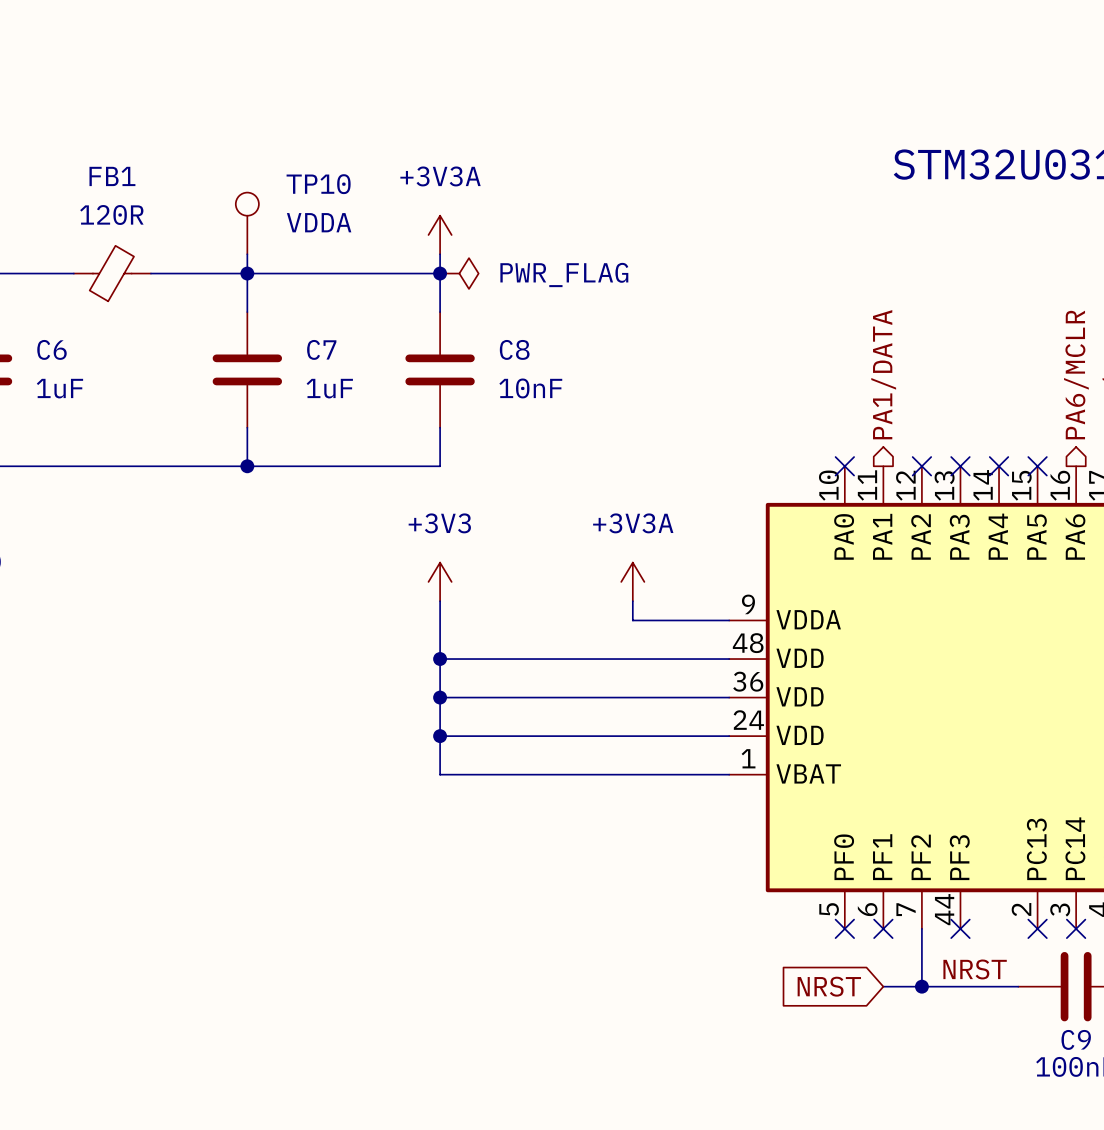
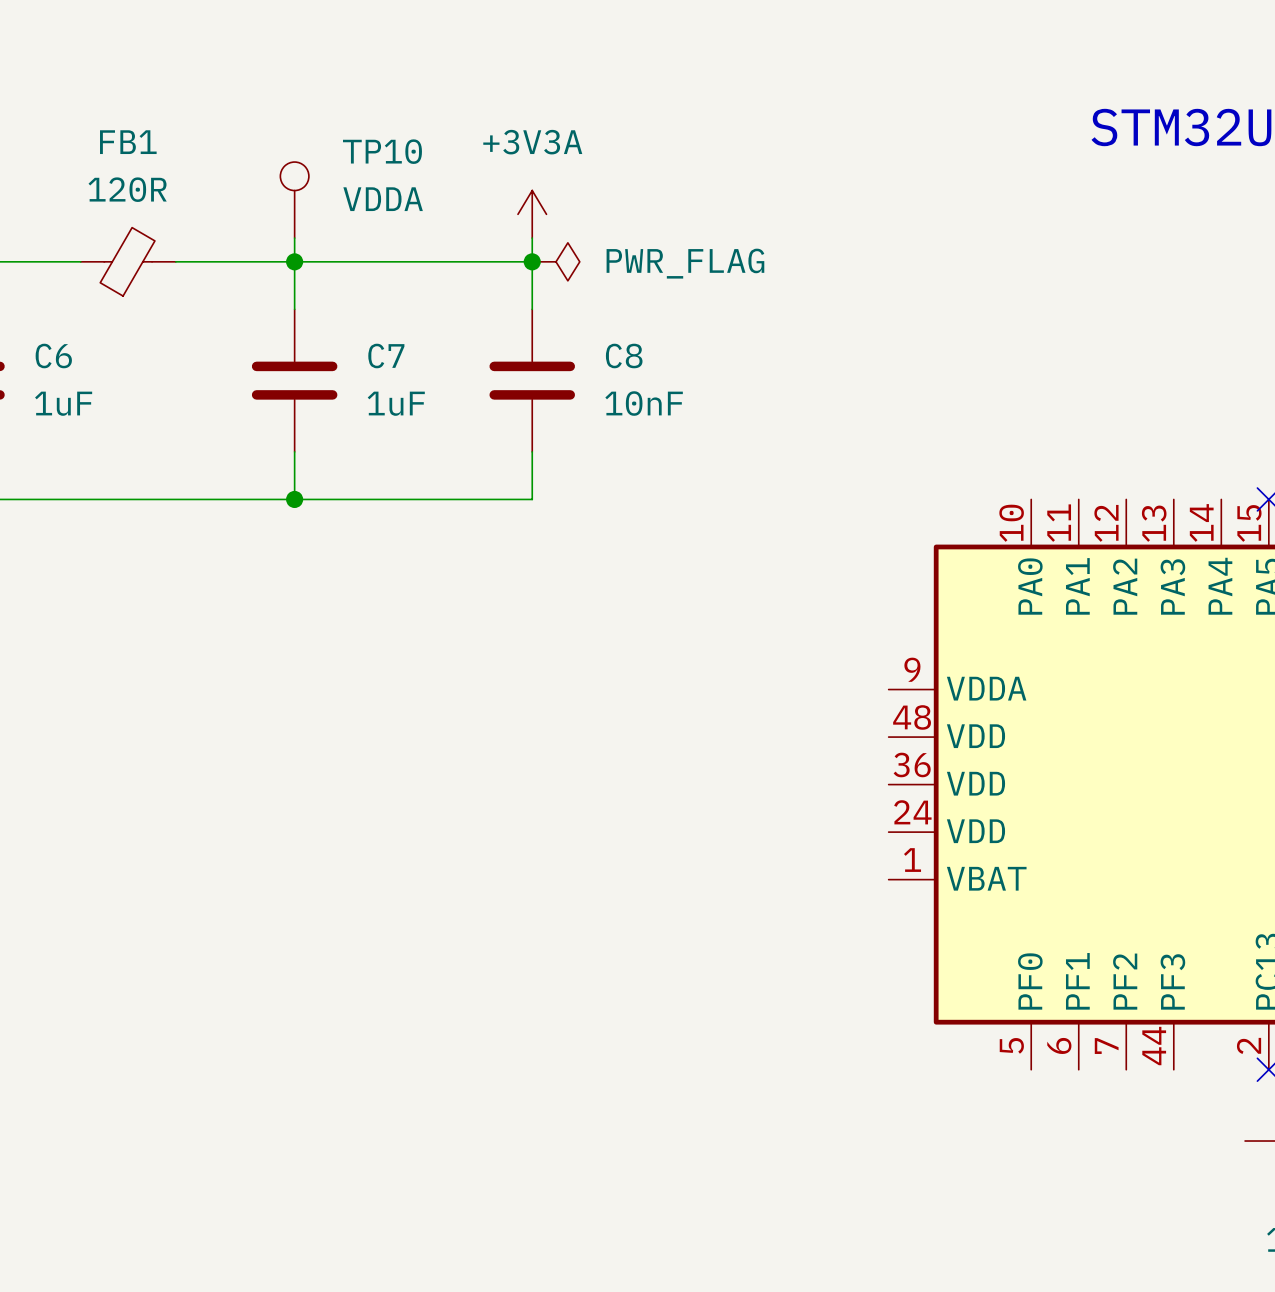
hierarchical label: PA1/DATA (883, 374) -> none
no-connect mark: (844, 466) -> none
no-connect mark: (921, 466) -> none
no-connect mark: (960, 466) -> none
no-connect mark: (999, 466) -> none
power symbol: +3V3 (440, 581) -> none
power symbol: +3V3A (632, 581) -> none
wire: (440, 601) (440, 774) (729, 774) -> none
wire: (632, 601) (632, 620) (729, 620) -> none
wire: (440, 659) (729, 659) -> none
junction: (440, 659) -> none
wire: (440, 697) (729, 697) -> none
junction: (440, 697) -> none
wire: (440, 736) (729, 736) -> none
junction: (440, 736) -> none
no-connect mark: (844, 928) -> none
no-connect mark: (883, 928) -> none
wire: (921, 928) (921, 986) -> none
no-connect mark: (960, 928) -> none
label: NRST (975, 969) -> none
global label: NRST (829, 986) -> none
wire: (883, 986) (1018, 986) -> none
junction: (921, 986) -> none

